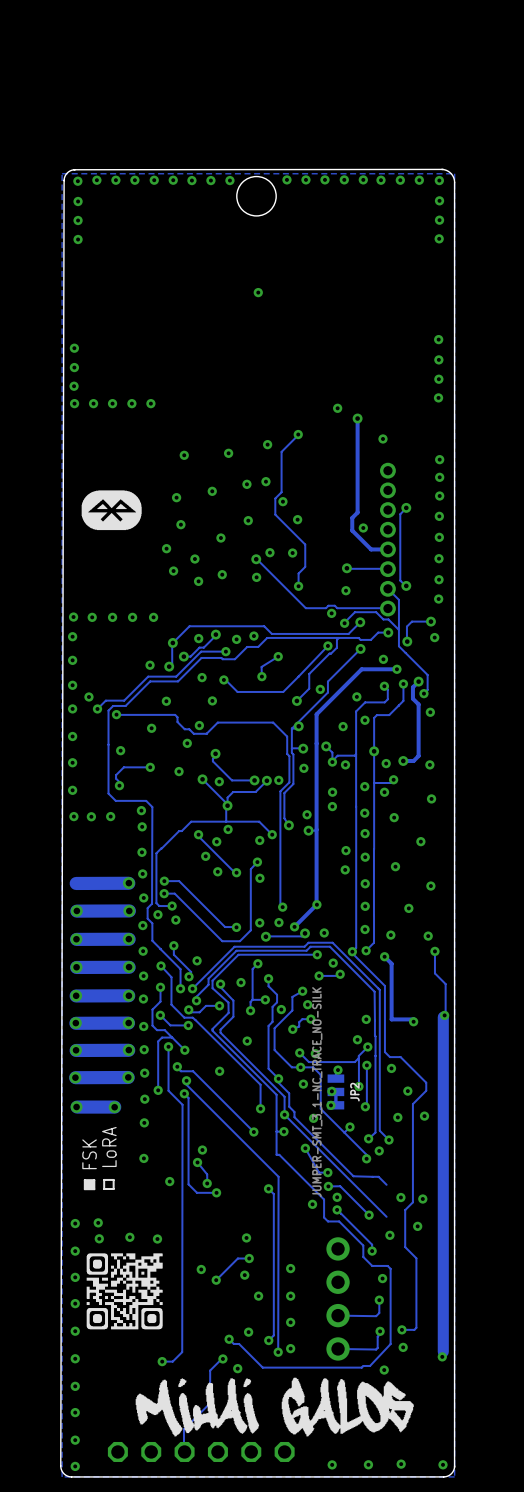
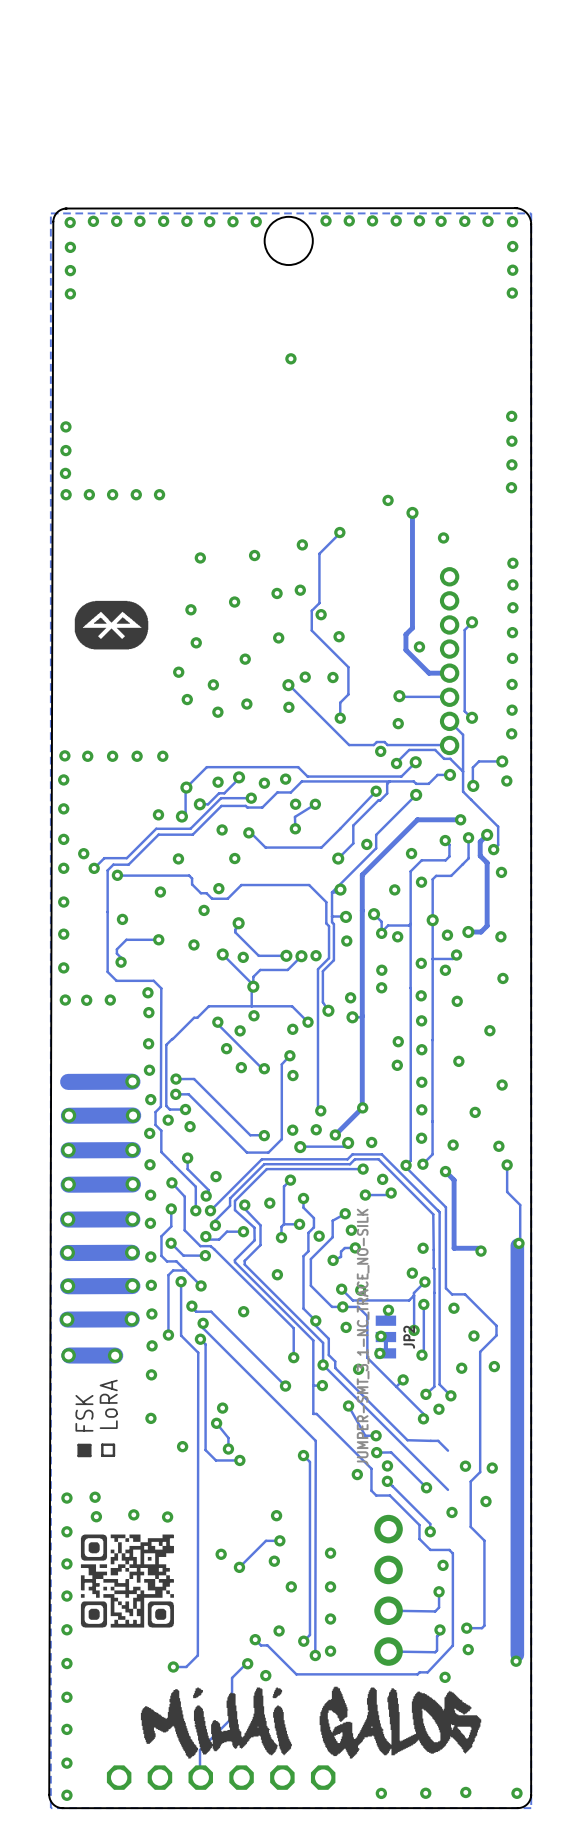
via: none -> (295, 804)
via: (383, 659) -> none

